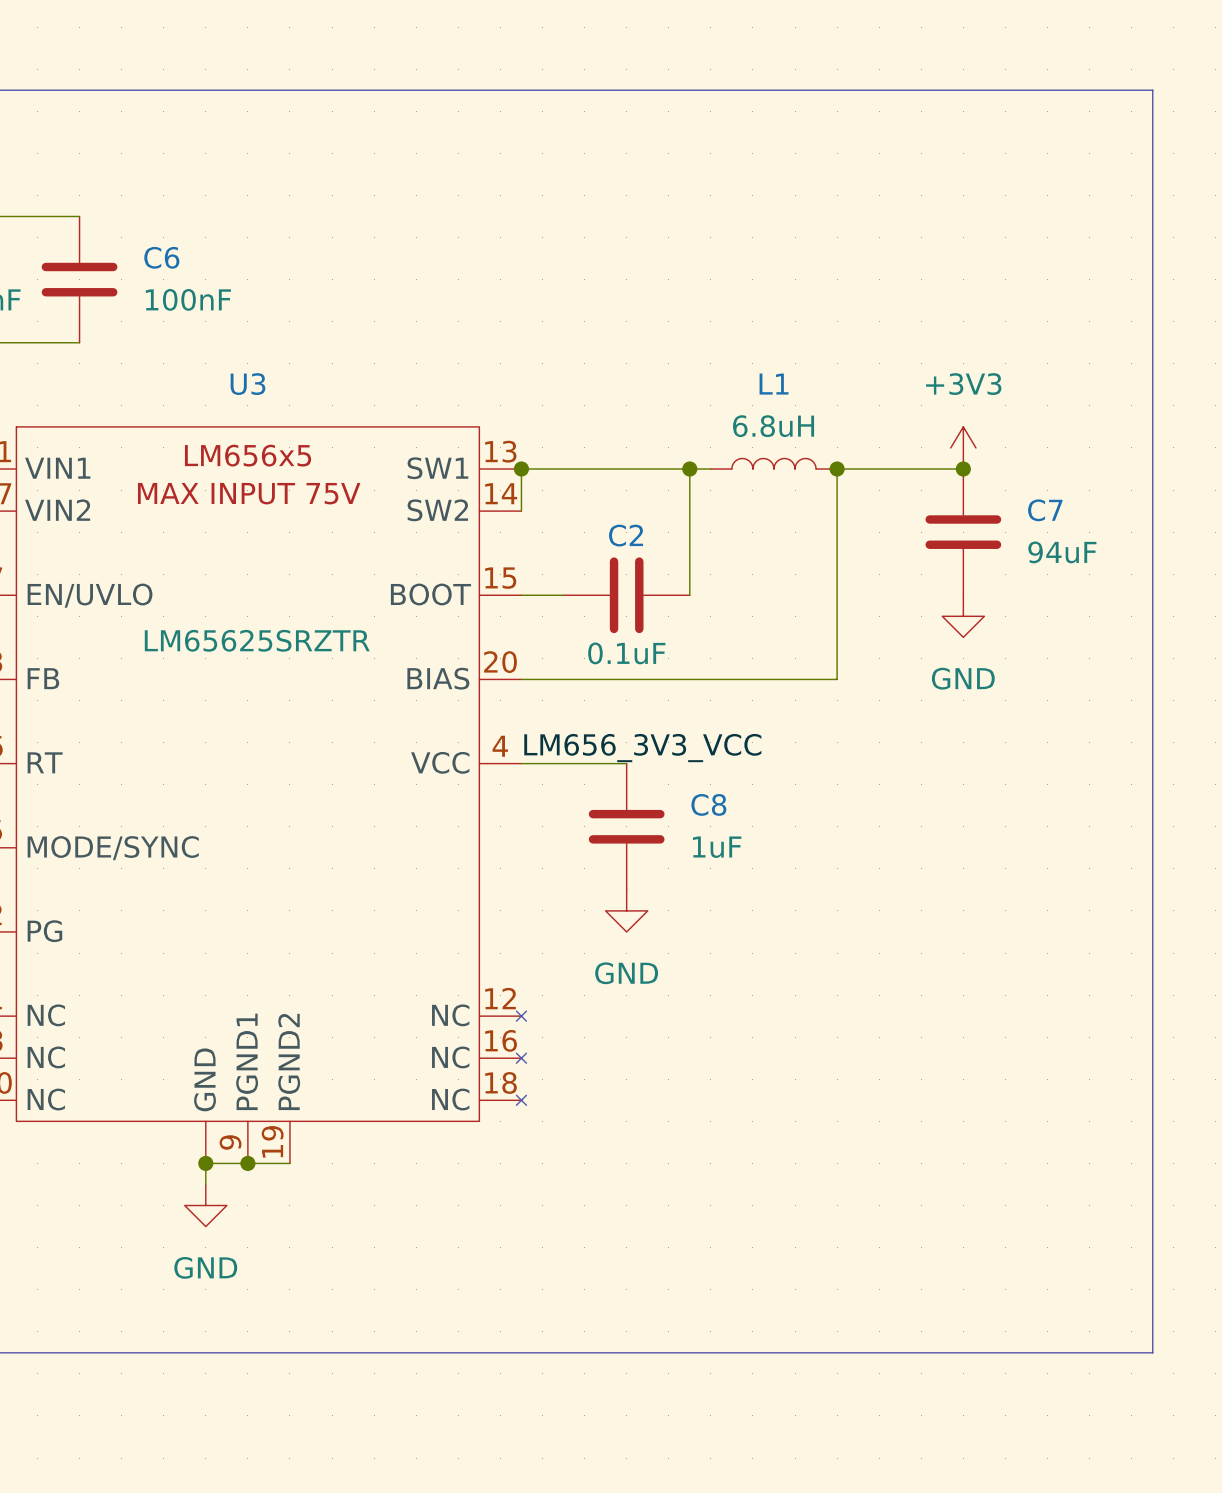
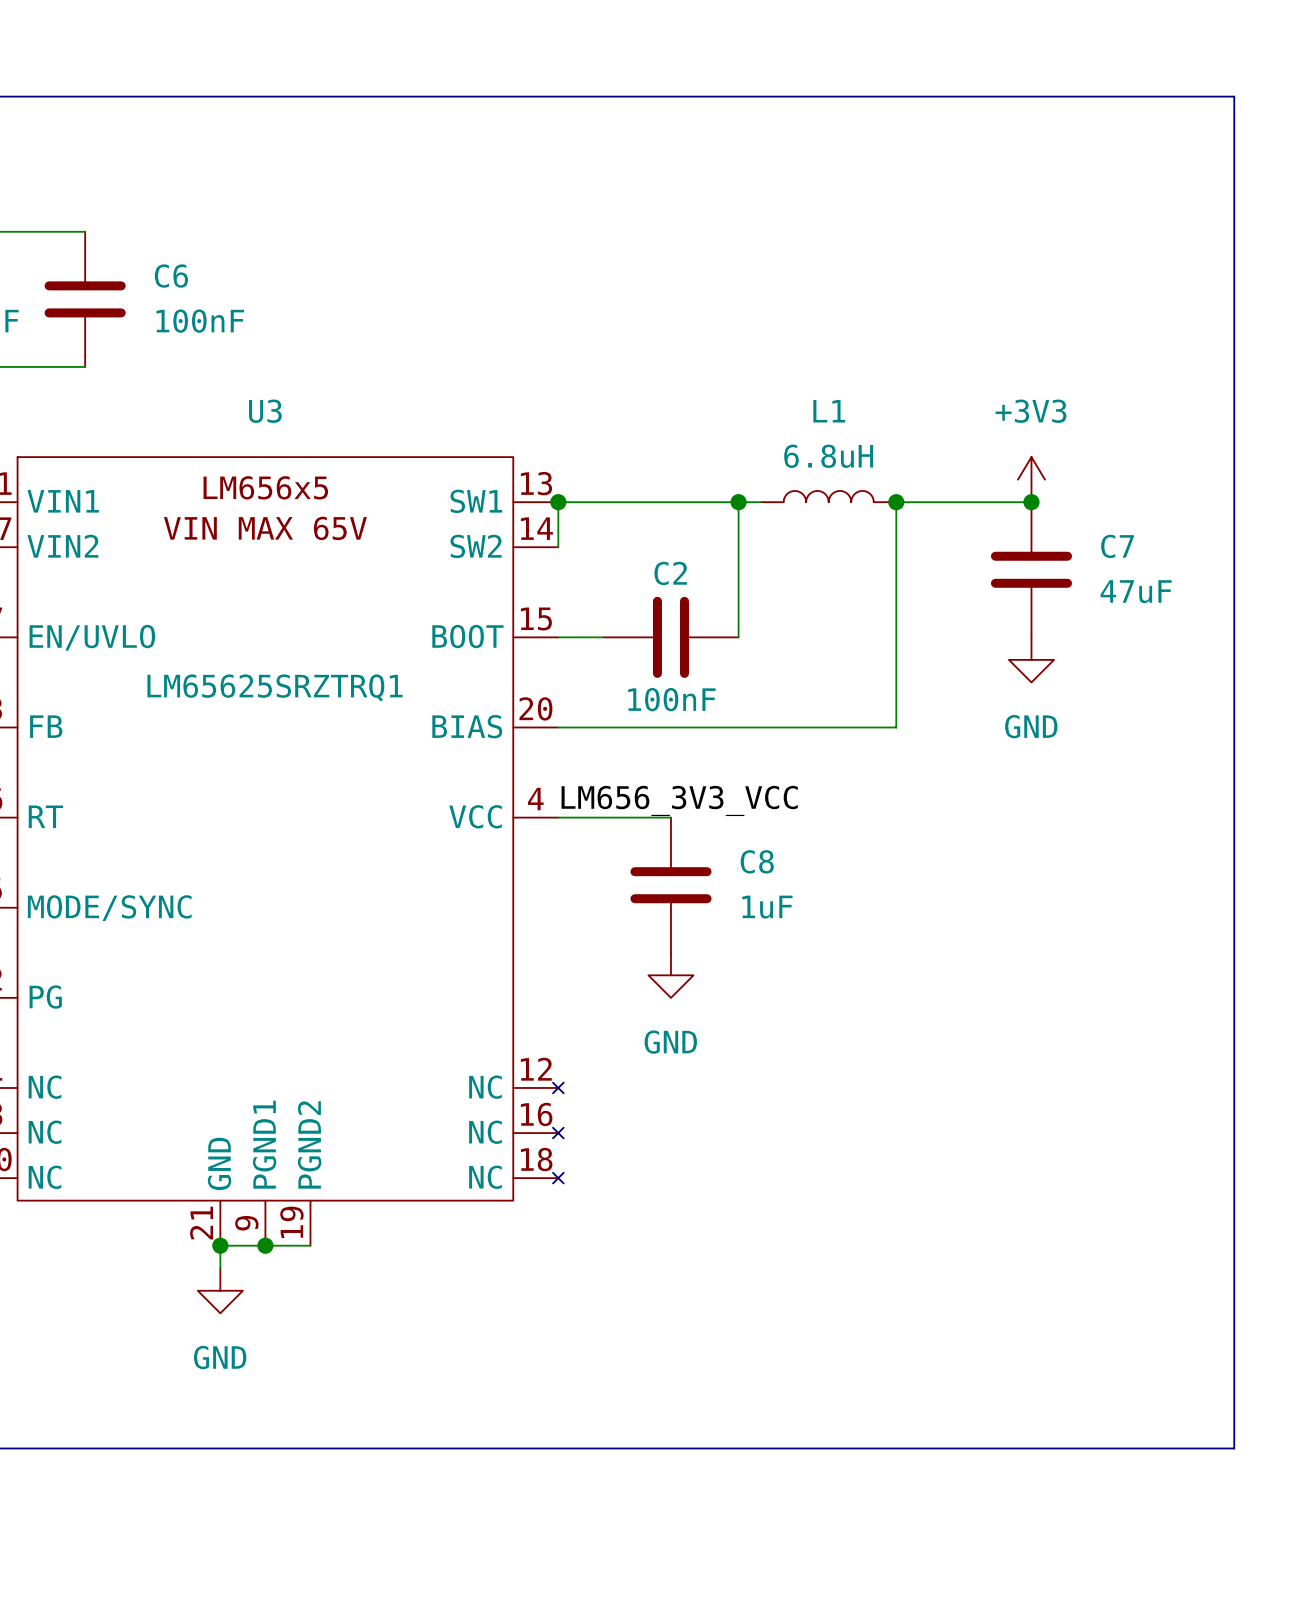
U3 text: MAX INPUT 75V (249, 493) -> VIN MAX 65V (265, 528)
C7 value: 94uF (1062, 552) -> 47uF (1136, 591)
U3 value: LM65625SRZTR (257, 640) -> LM65625SRZTRQ1 (275, 687)
C2 value: 0.1uF (626, 653) -> 100nF (671, 699)
U3 pin number: none -> 21 (201, 1223)

